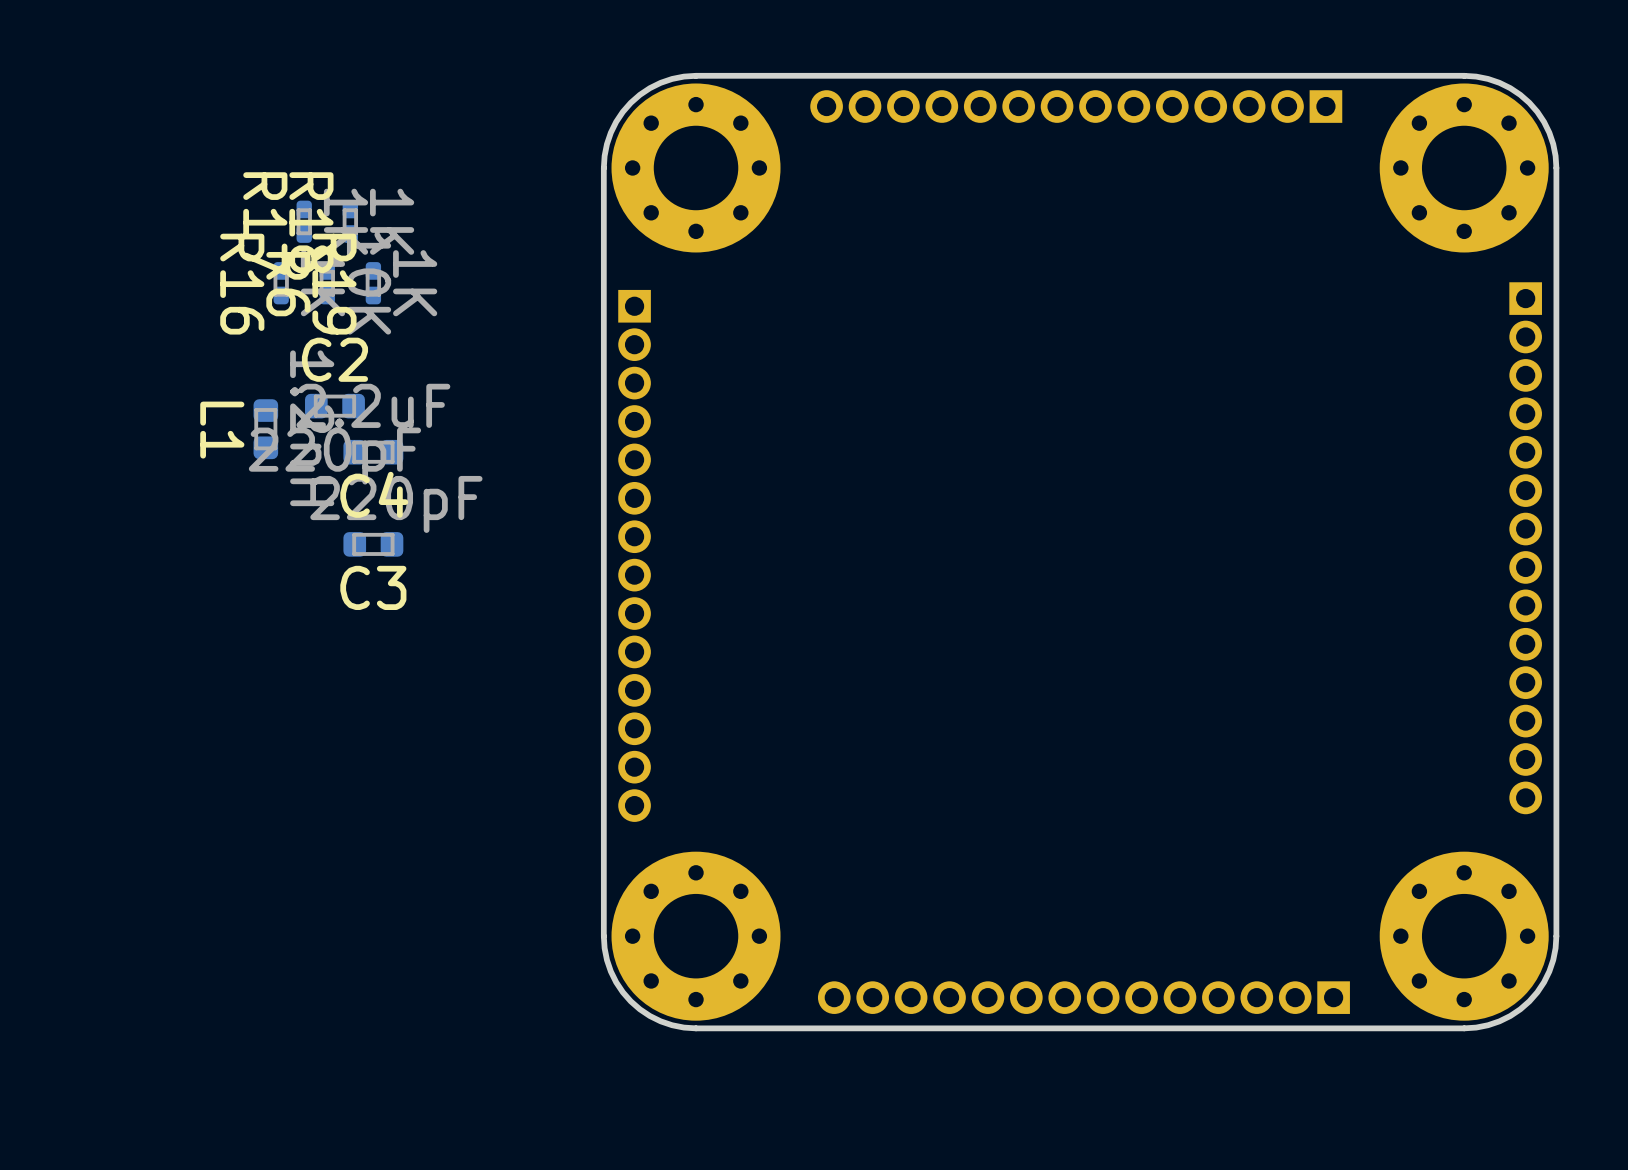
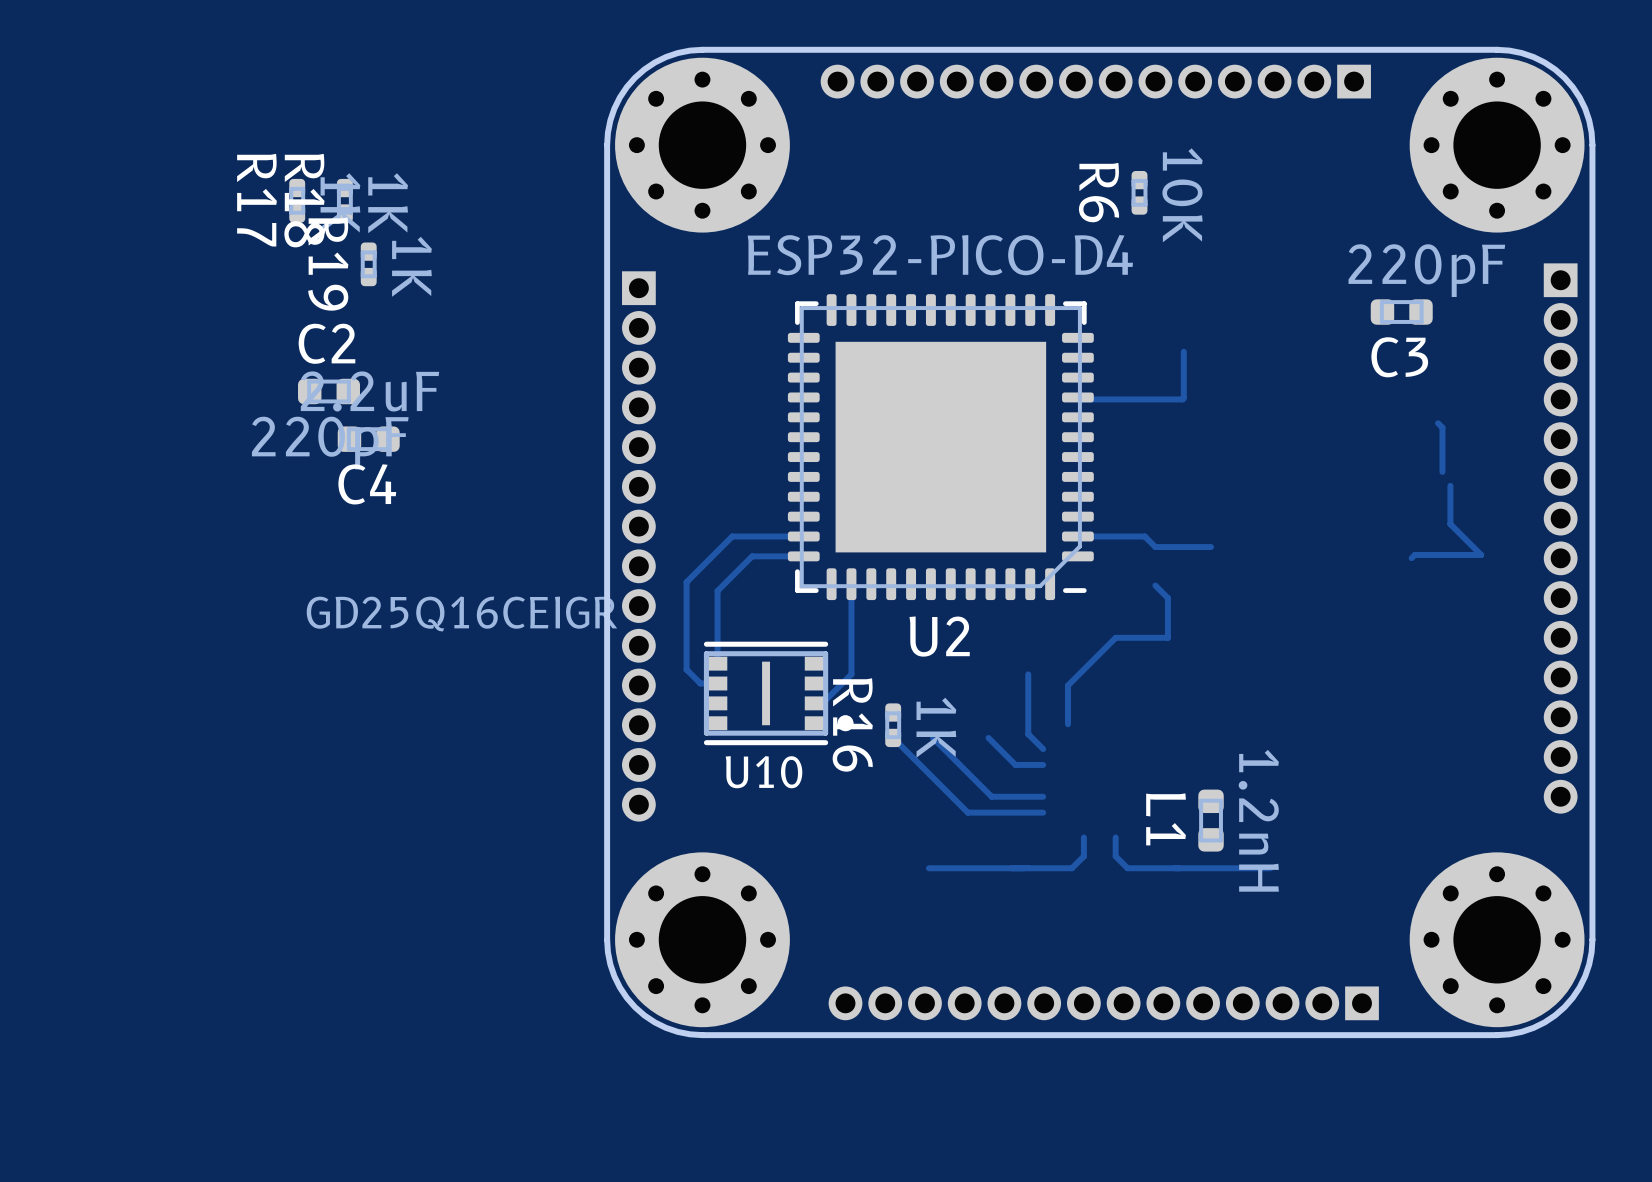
R16 position: (281, 283) -> (893, 725)
R6 position: (327, 283) -> (1139, 192)
track: none -> (1183, 351) (1182, 399) (1079, 399) (1077, 397)
L1 position: (265, 429) -> (1211, 820)
track: none -> (1438, 423) (1442, 427) (1442, 471)
U2: none -> ESP32-PICO-D4 (940, 447)
track: none -> (1450, 485) (1450, 524) (1481, 554) (1414, 554) (1411, 558)
C3 position: (373, 544) -> (1401, 312)
track: none -> (803, 536) (732, 536) (686, 582) (686, 669) (700, 683) (717, 683)
track: none -> (1077, 536) (1144, 536) (1155, 547) (1211, 547)
track: none -> (803, 556) (752, 556) (717, 590) (717, 663)
track: none -> (851, 584) (851, 674) (822, 703) (814, 703)
track: none -> (1155, 585) (1167, 598) (1167, 637) (1115, 637) (1067, 685) (1067, 724)
track: none -> (1028, 674) (1028, 734) (1043, 749)
U10: none -> GD25Q16CEIGR (778, 693)
track: none -> (893, 737) (967, 812) (1043, 812)
track: none -> (932, 737) (991, 796) (1043, 796)
track: none -> (988, 737) (1015, 764) (1043, 764)
track: none -> (1083, 837) (1083, 856) (1071, 868) (928, 868)
track: none -> (1115, 837) (1115, 856) (1127, 868) (1270, 868)

